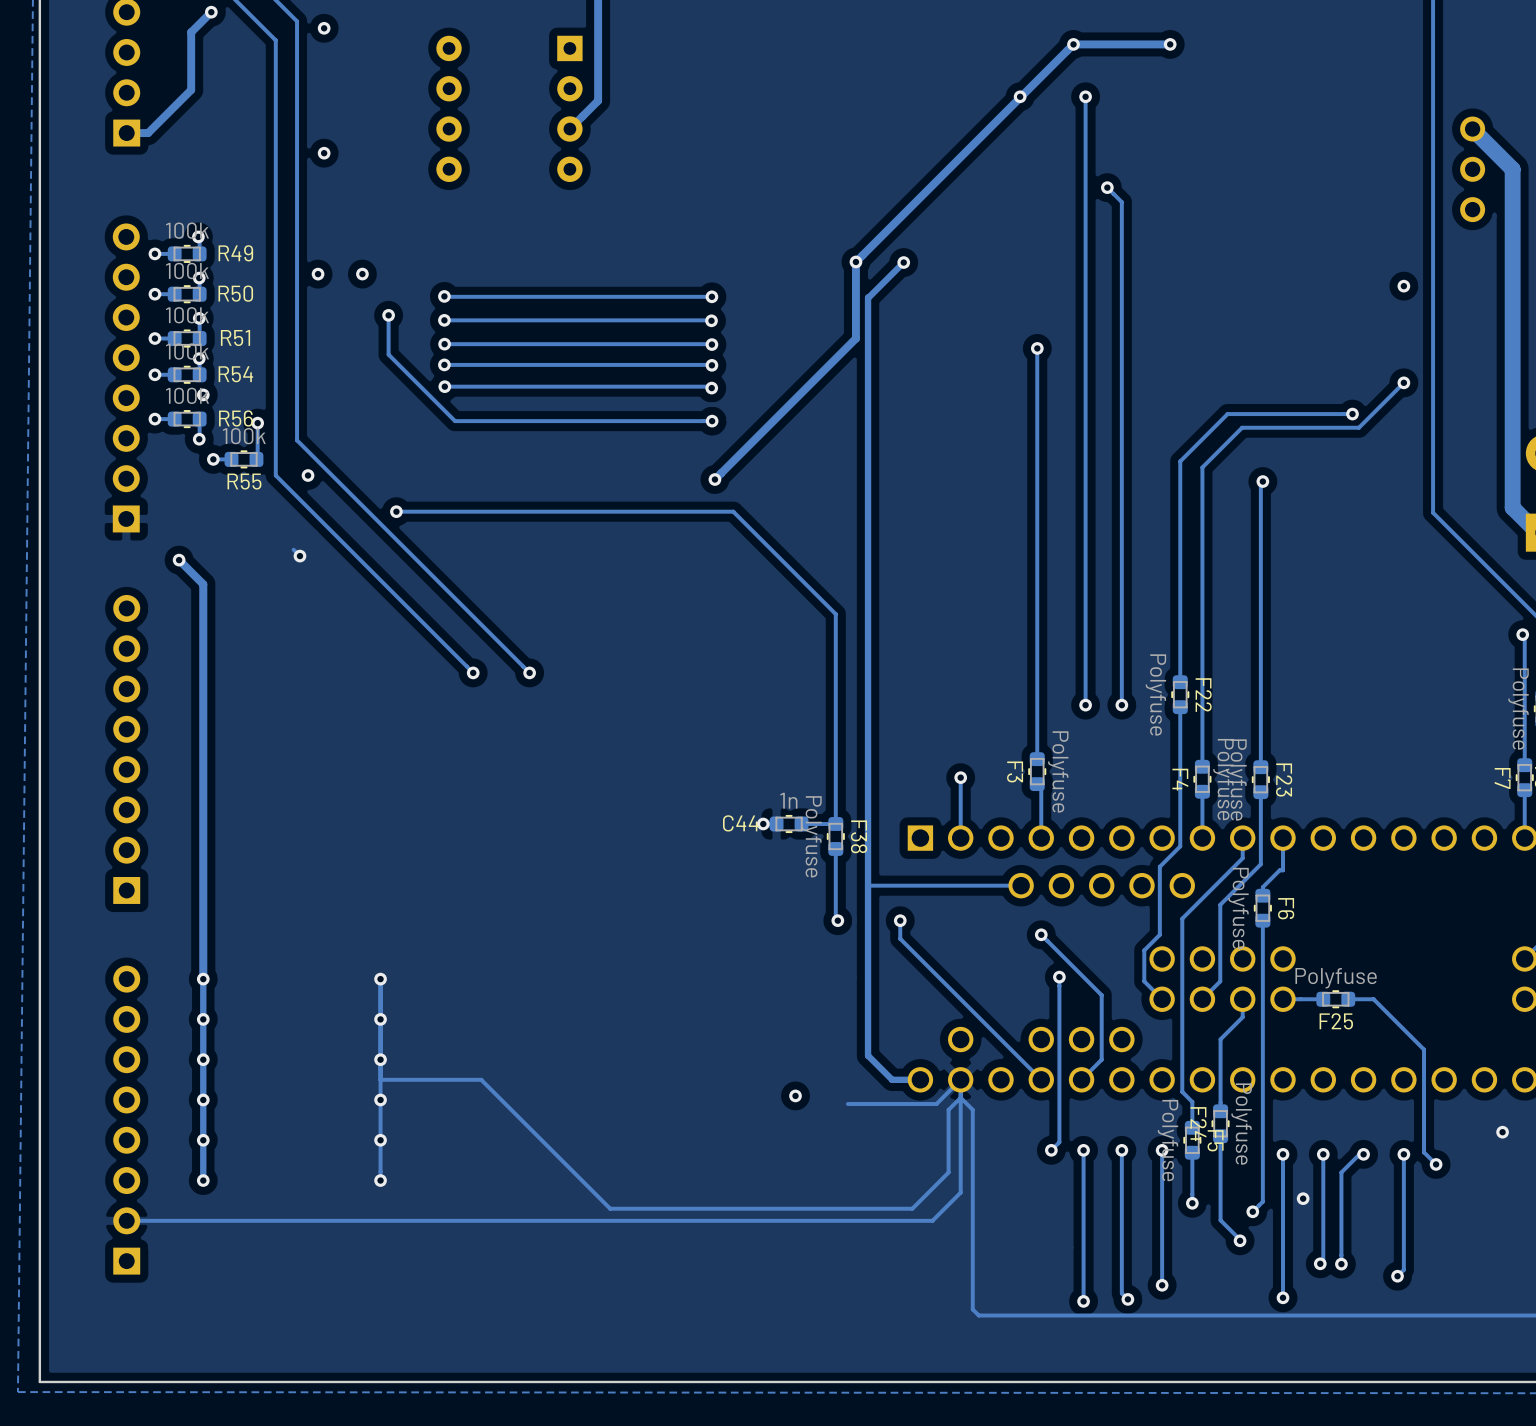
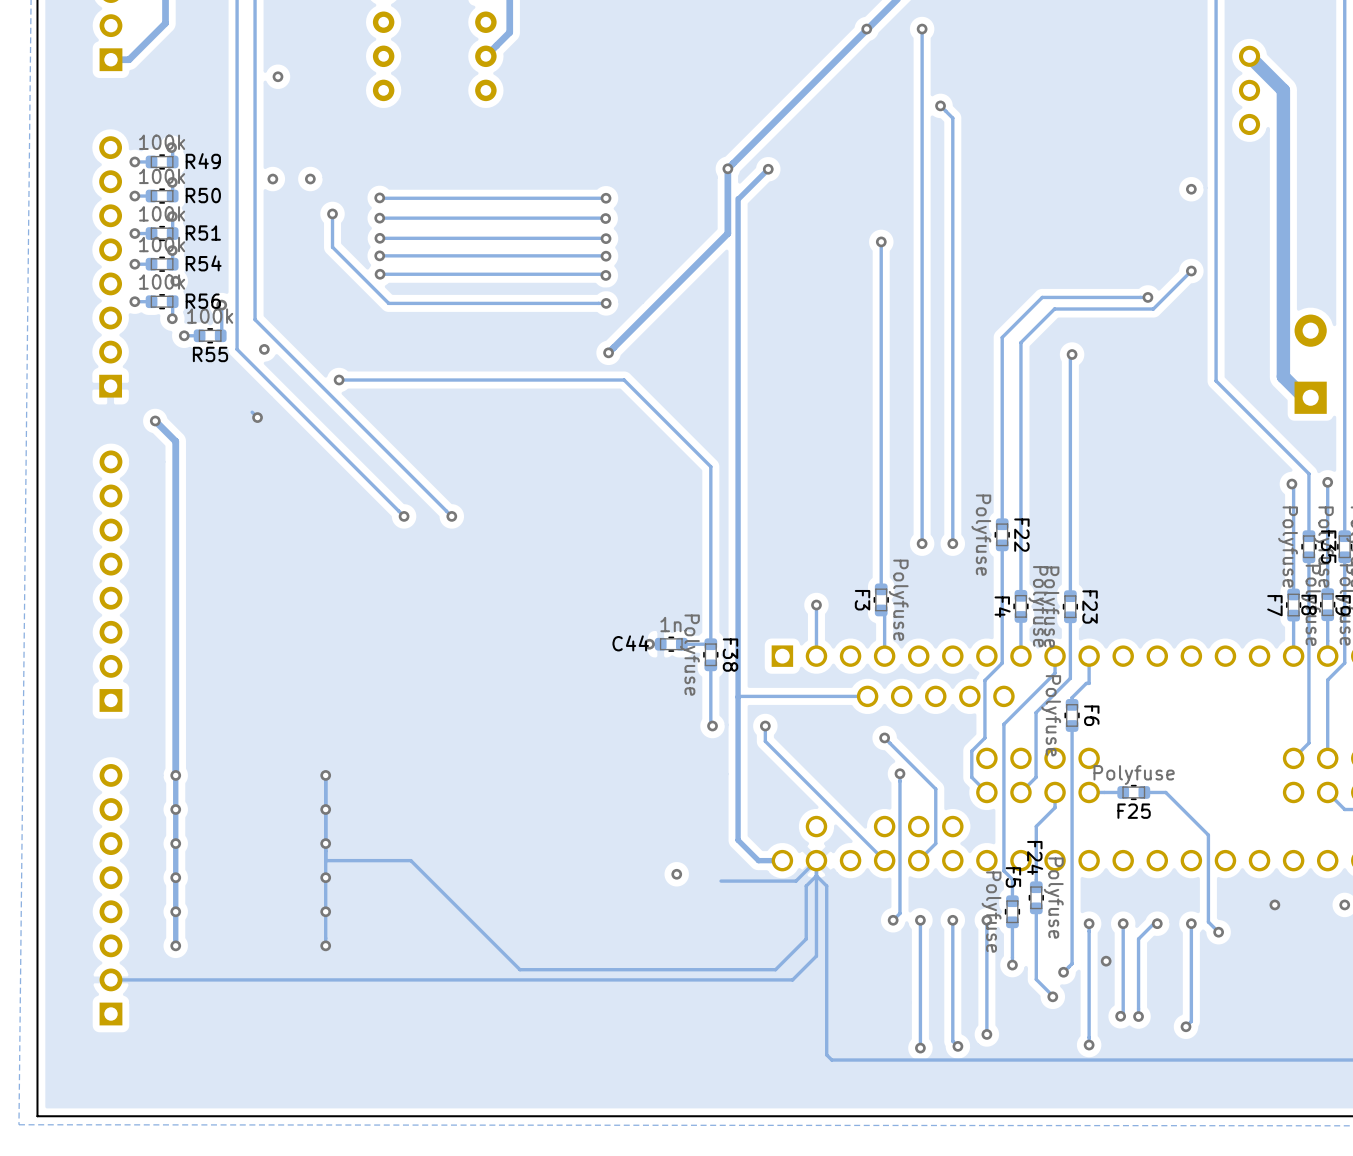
F24 name position: F24 (1198, 1124) -> F24 (1035, 857)
F5 name position: F5 (1215, 1140) -> F5 (1013, 877)

